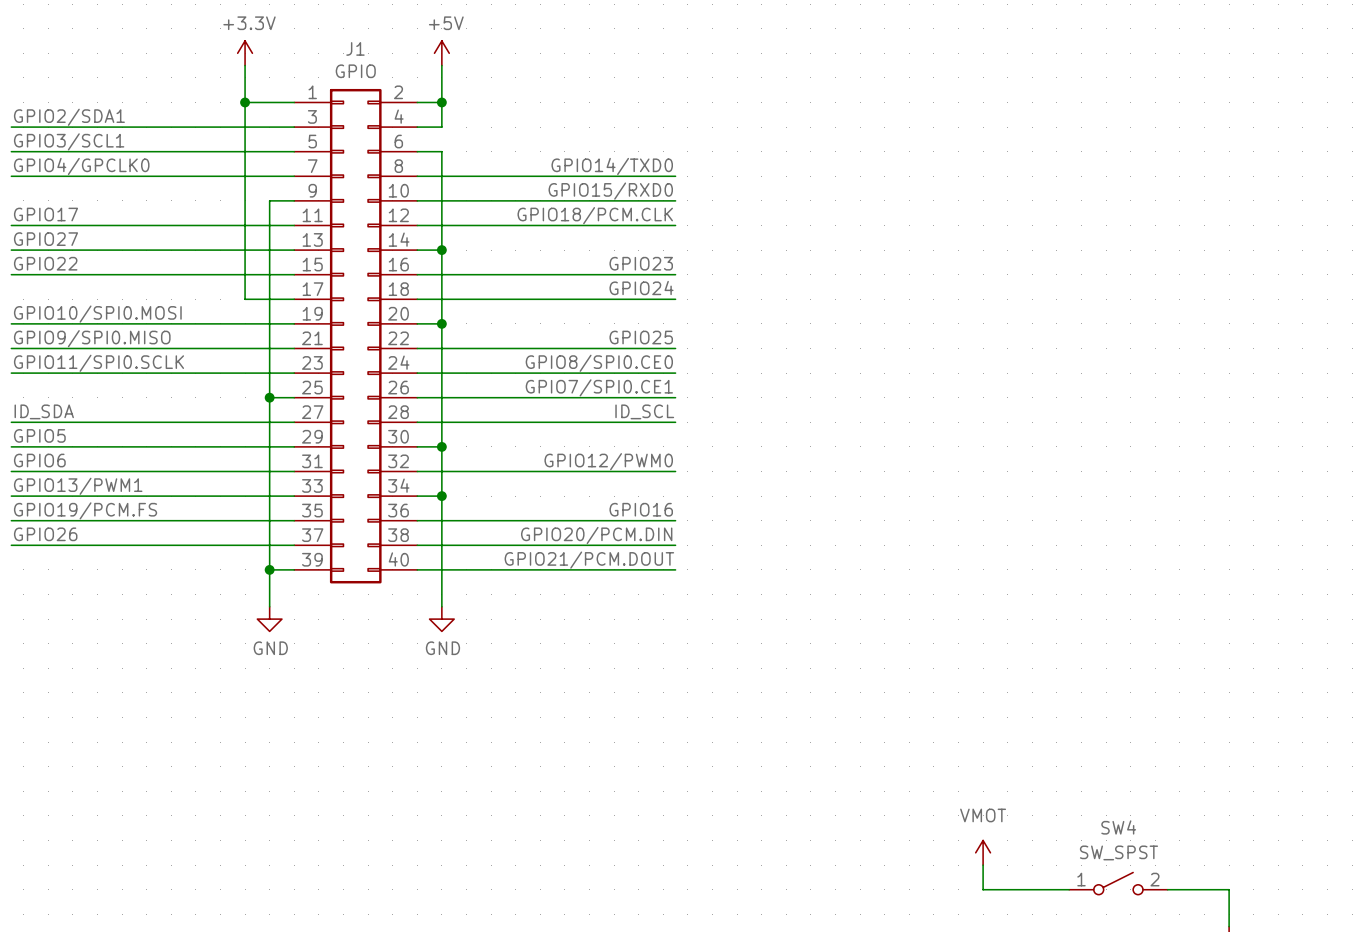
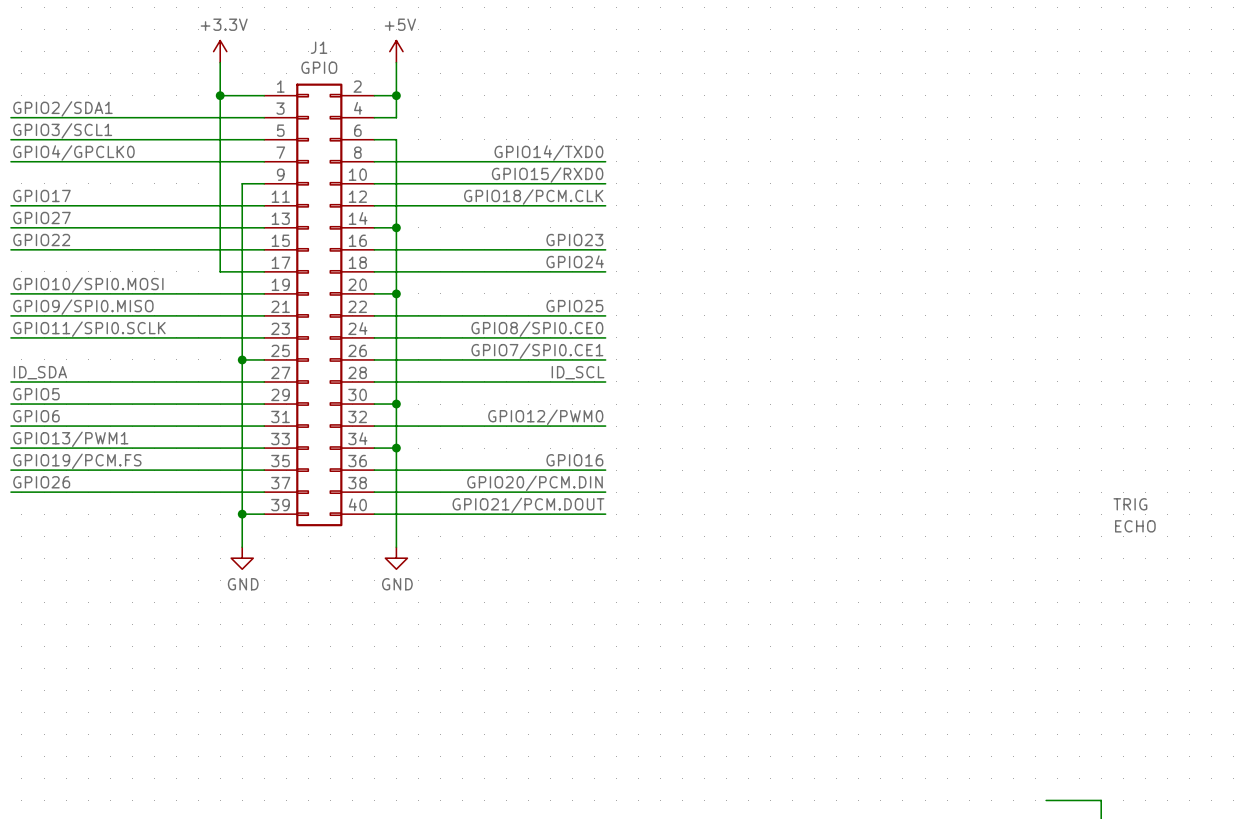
label: none -> TRIG (1130, 504)
label: none -> ECHO (1135, 526)
power symbol: VMOT (983, 852) -> none
wire: (983, 865) (983, 889) (1069, 889) -> none
SW4: SW_SPST (1118, 883) -> none

